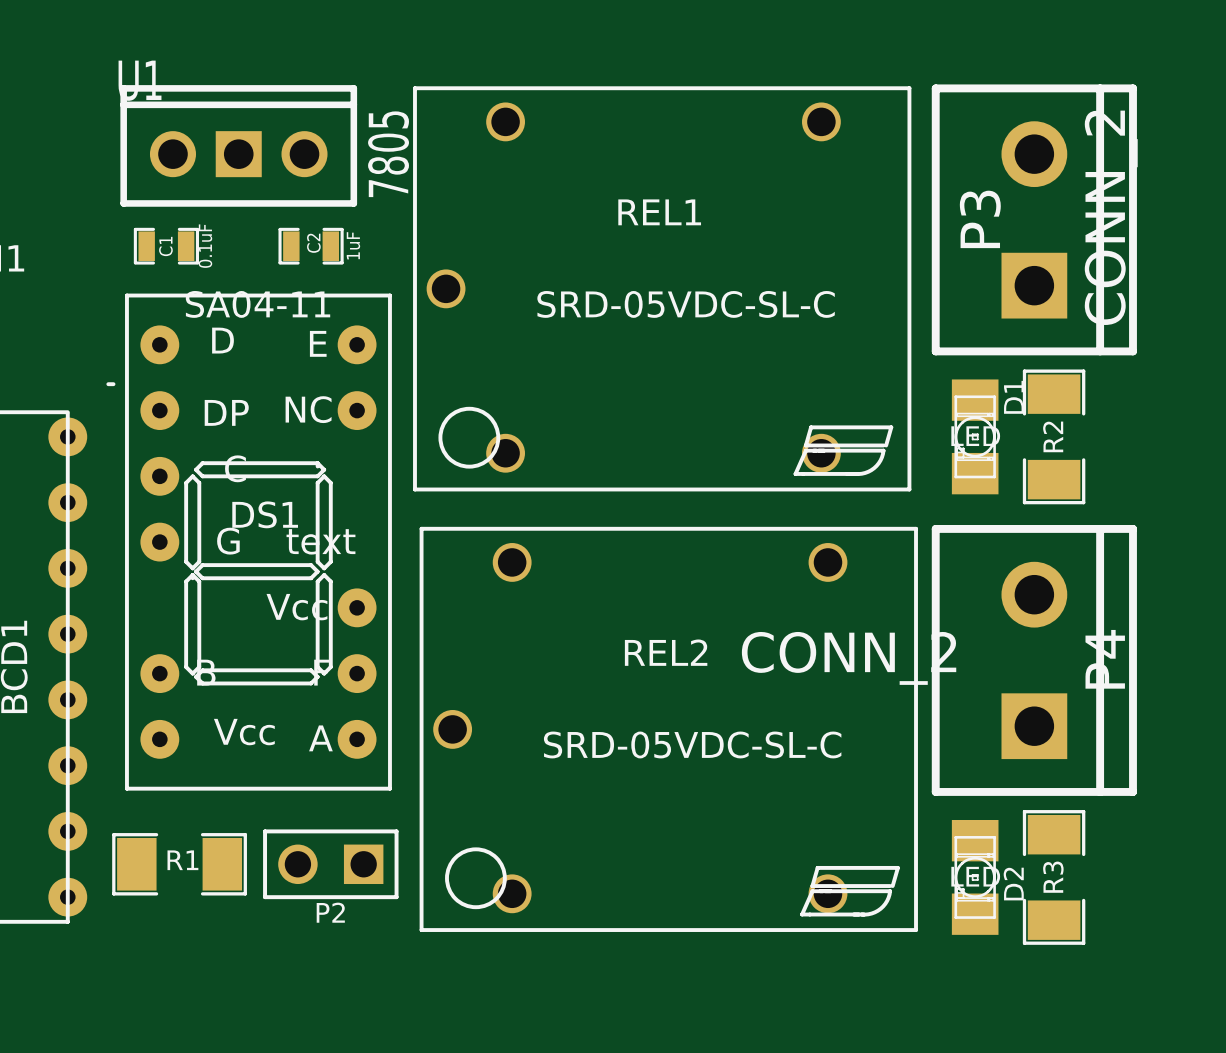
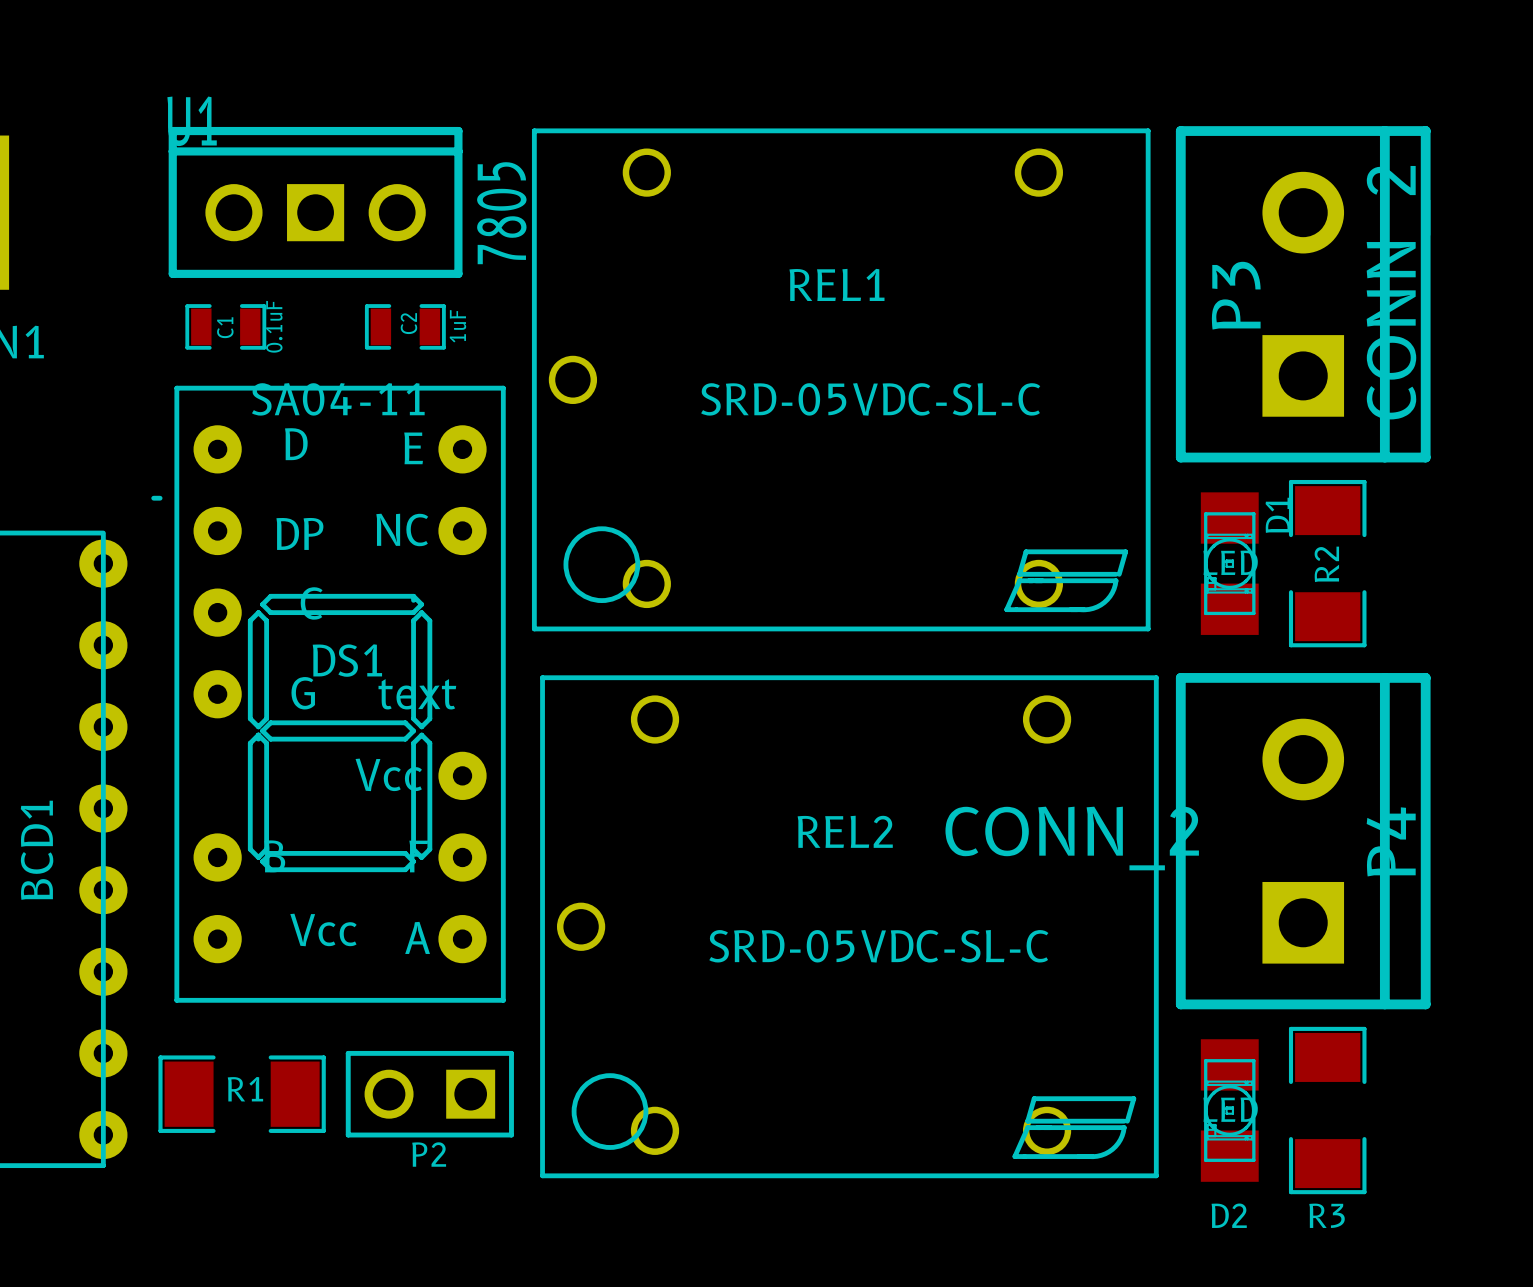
R3 name rotation: 0° (1053, 877) -> 90° clockwise (1327, 1215)
R3 name position: R3 (1053, 877) -> R3 (1327, 1215)
D2 name rotation: 0° (1013, 884) -> 90° clockwise (1229, 1215)
D2 name position: D2 (1013, 884) -> D2 (1229, 1215)

